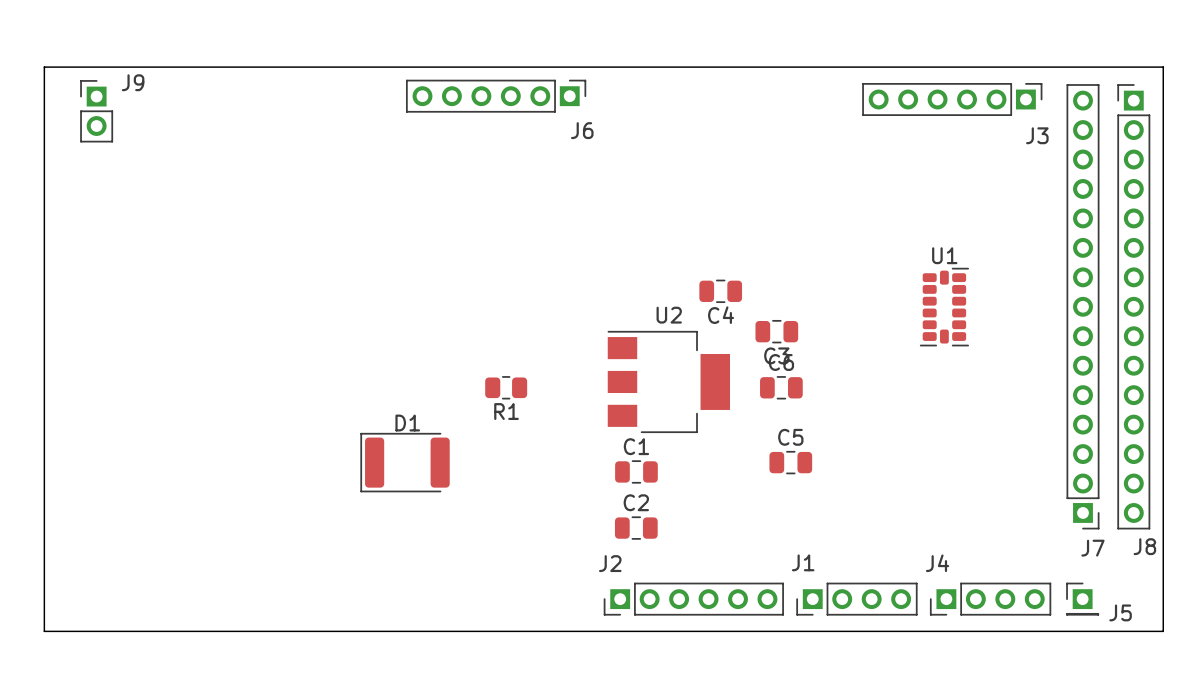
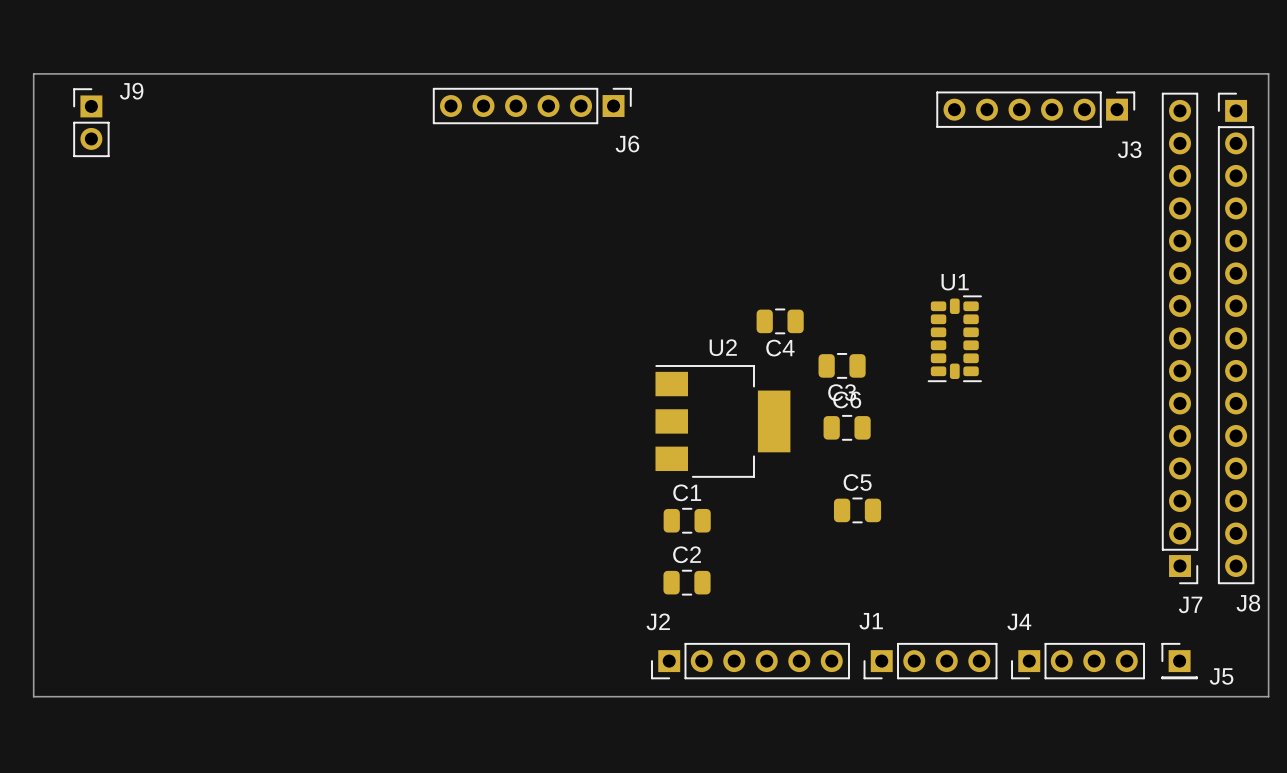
U1 position: (944, 307) -> (954, 338)
R1: (506, 387) -> none
D1: (405, 462) -> none

